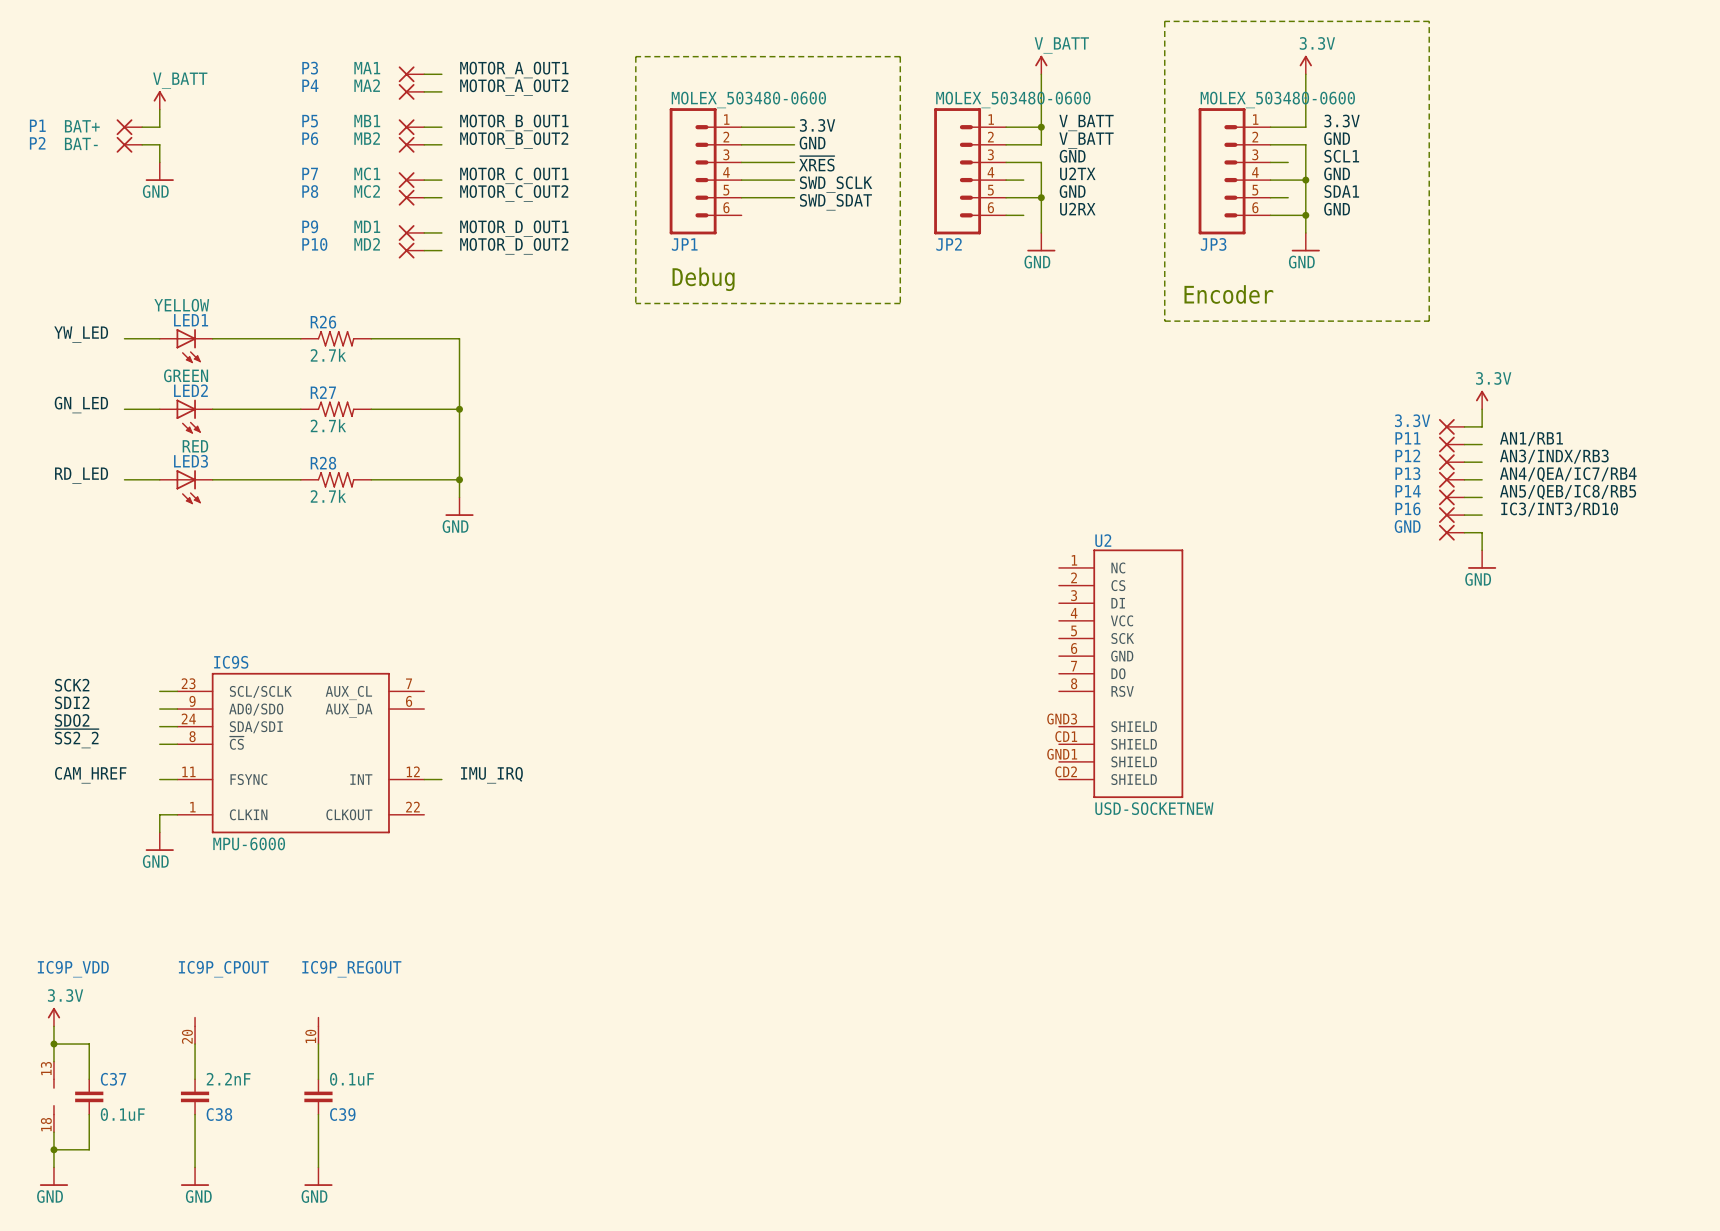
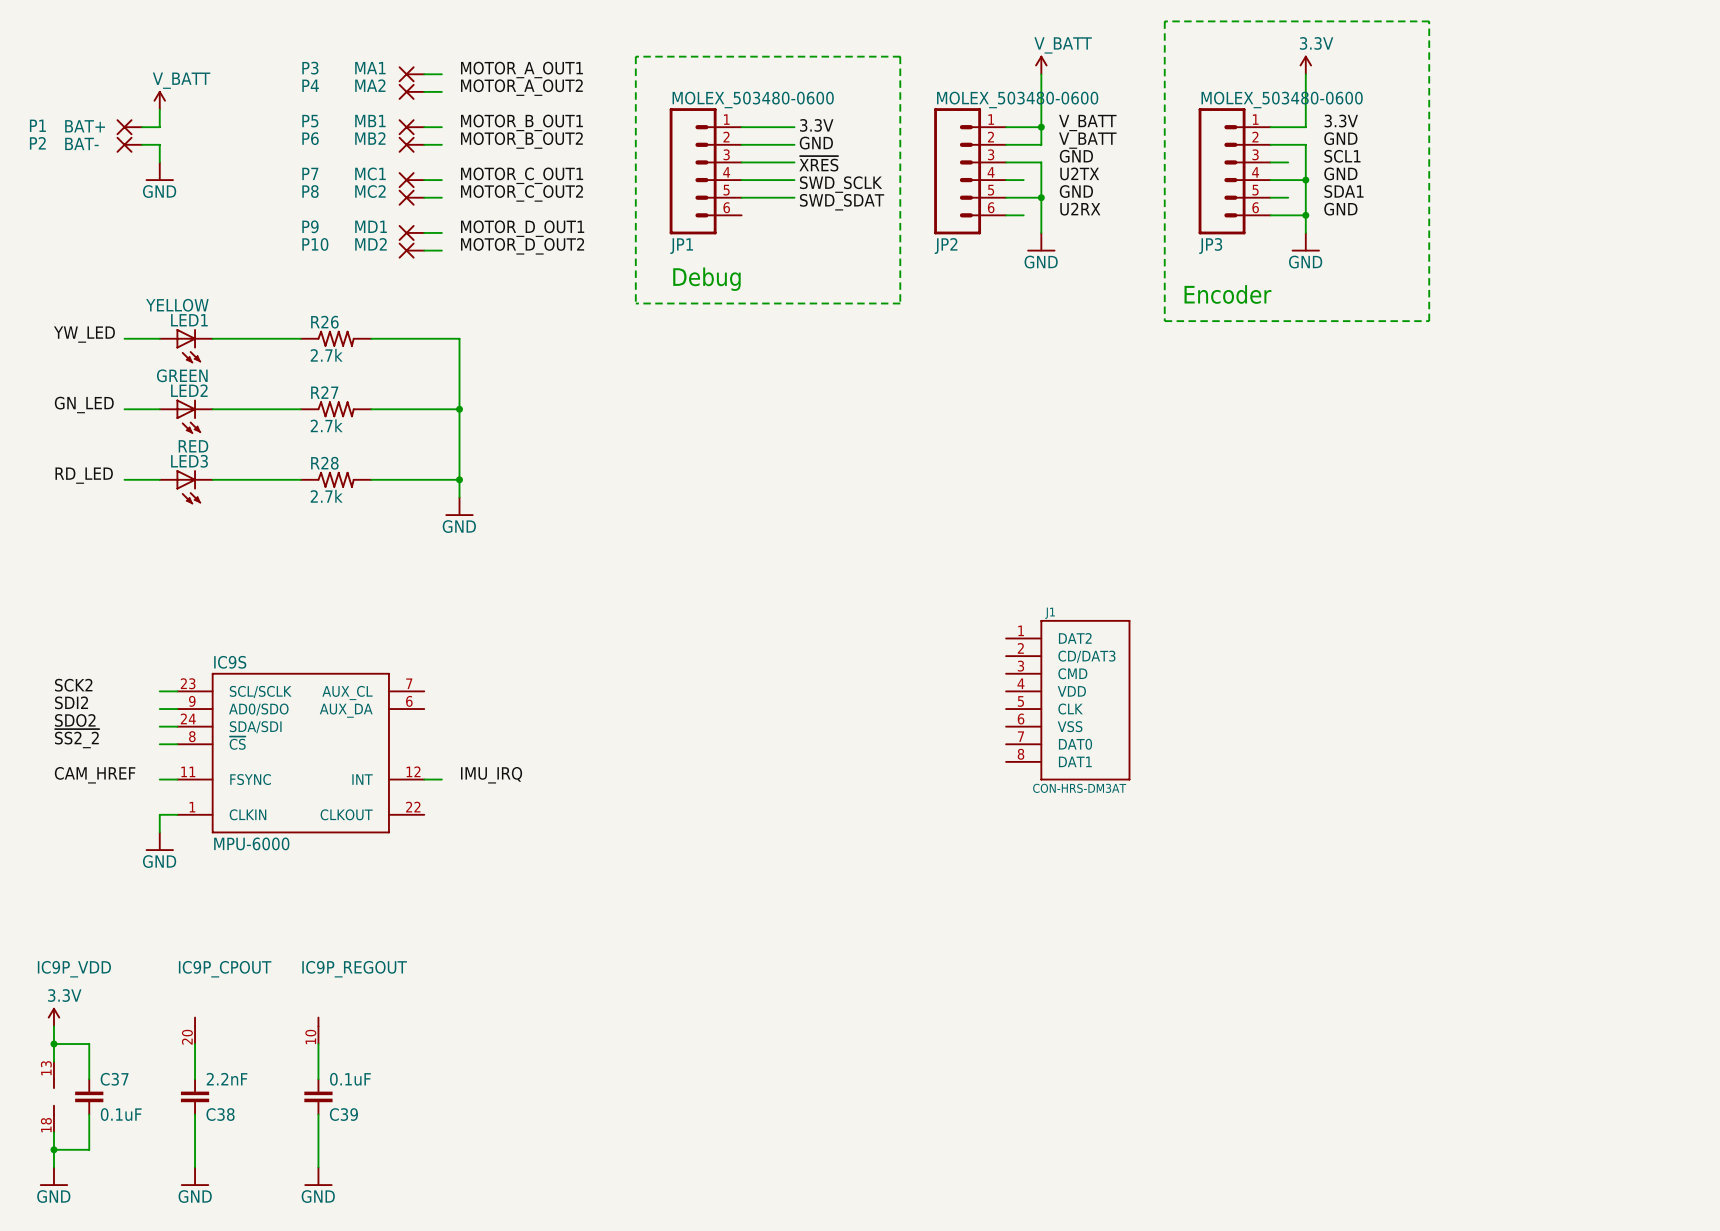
power symbol: 3.3V (1482, 400) -> none
wire: (1482, 409) (1482, 426) (1464, 426) -> none
3.3V: (1451, 426) -> none
label: AN1/RB1 (1531, 439) -> none
P11: (1451, 444) -> none
wire: (1464, 444) (1482, 444) -> none
label: AN3/INDX/RB3 (1554, 456) -> none
P12: (1451, 462) -> none
wire: (1464, 462) (1482, 462) -> none
label: AN4/QEA/IC7/RB4 (1568, 474) -> none
P13: (1451, 479) -> none
wire: (1464, 479) (1482, 479) -> none
label: AN5/QEB/IC8/RB5 (1568, 492) -> none
P14: (1451, 497) -> none
wire: (1464, 497) (1482, 497) -> none
label: IC3/INT3/RD10 (1559, 509) -> none
P16: (1451, 515) -> none
wire: (1464, 515) (1482, 515) -> none
GND: (1451, 532) -> none
wire: (1464, 532) (1482, 532) (1482, 550) -> none
power symbol: GND (1482, 559) -> none
U2: USD-SOCKETNEW (1121, 673) -> none
J1: none -> CON-HRS-DM3AT (1068, 700)

